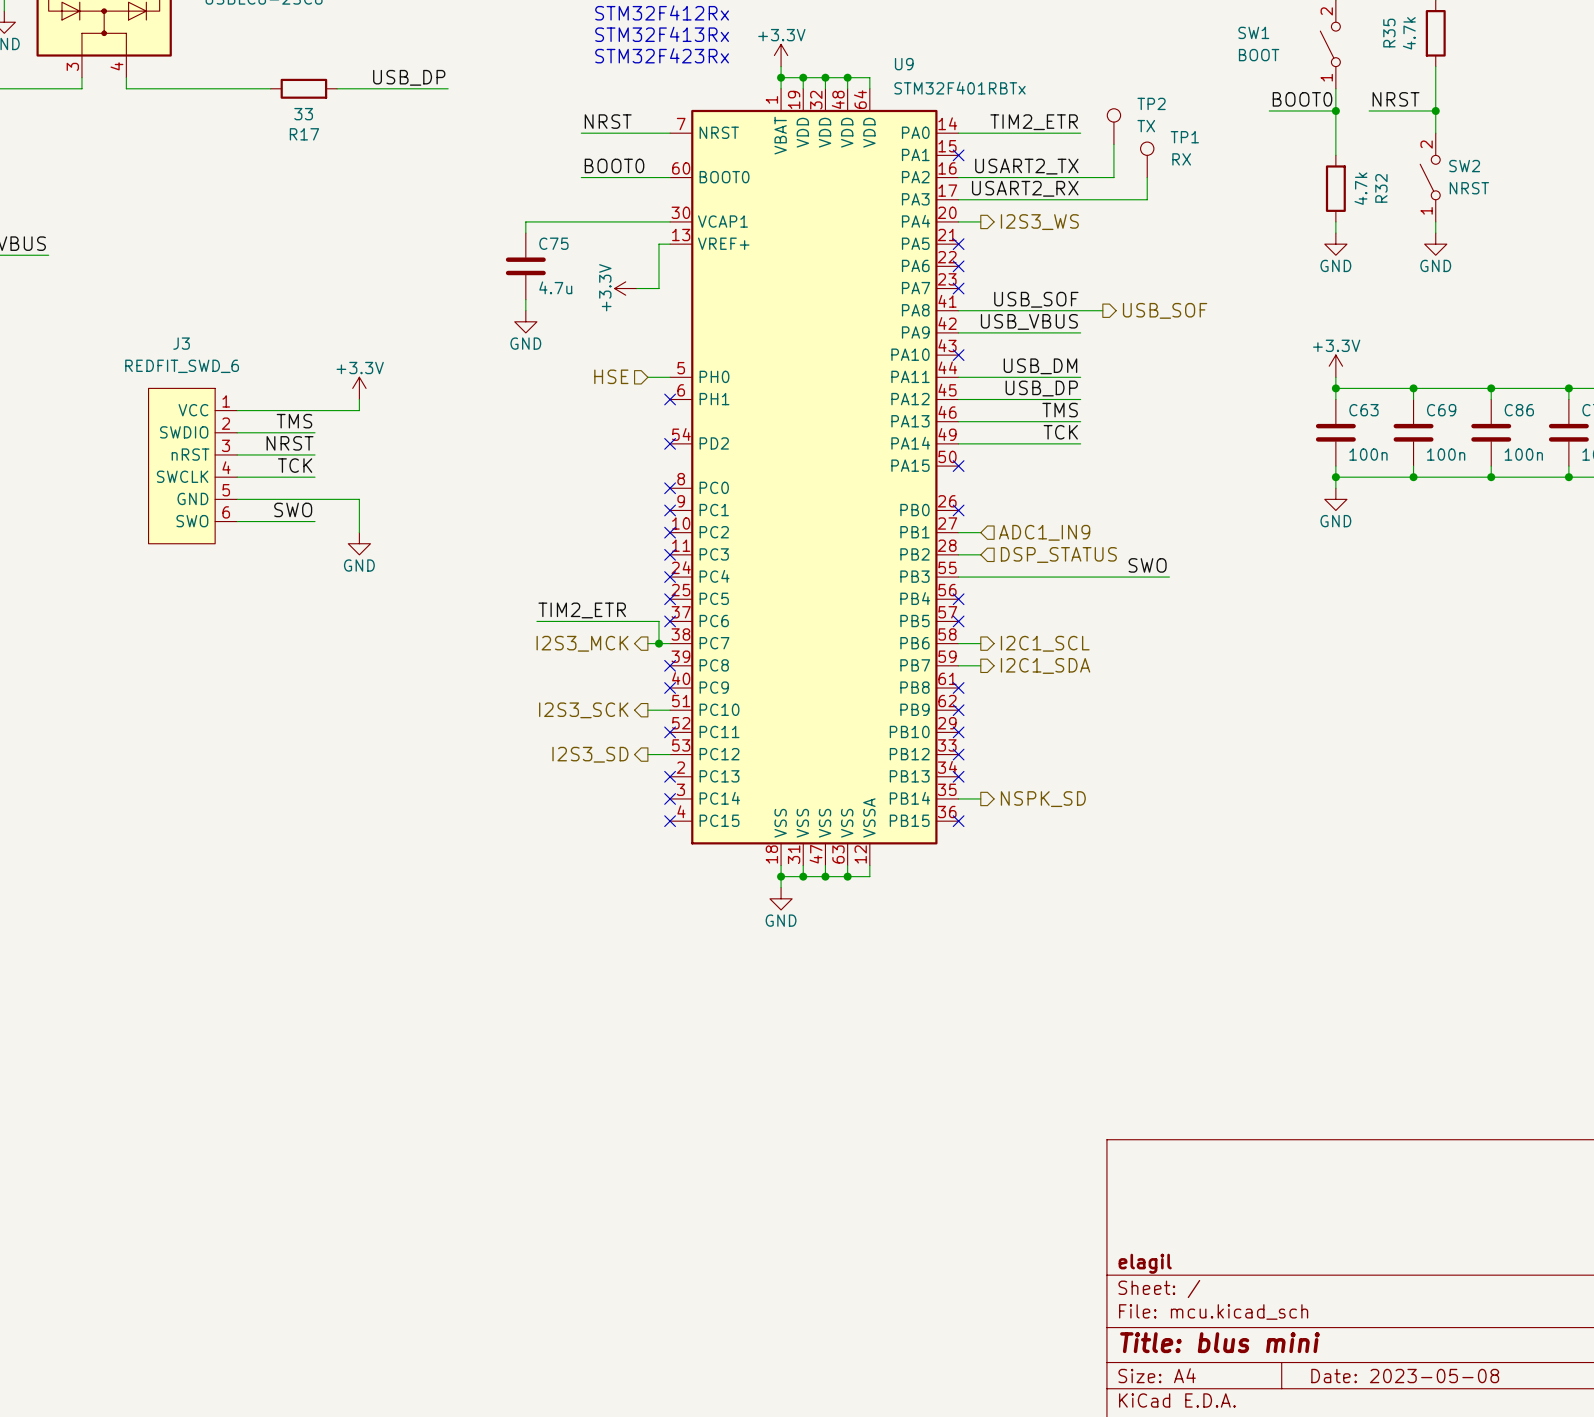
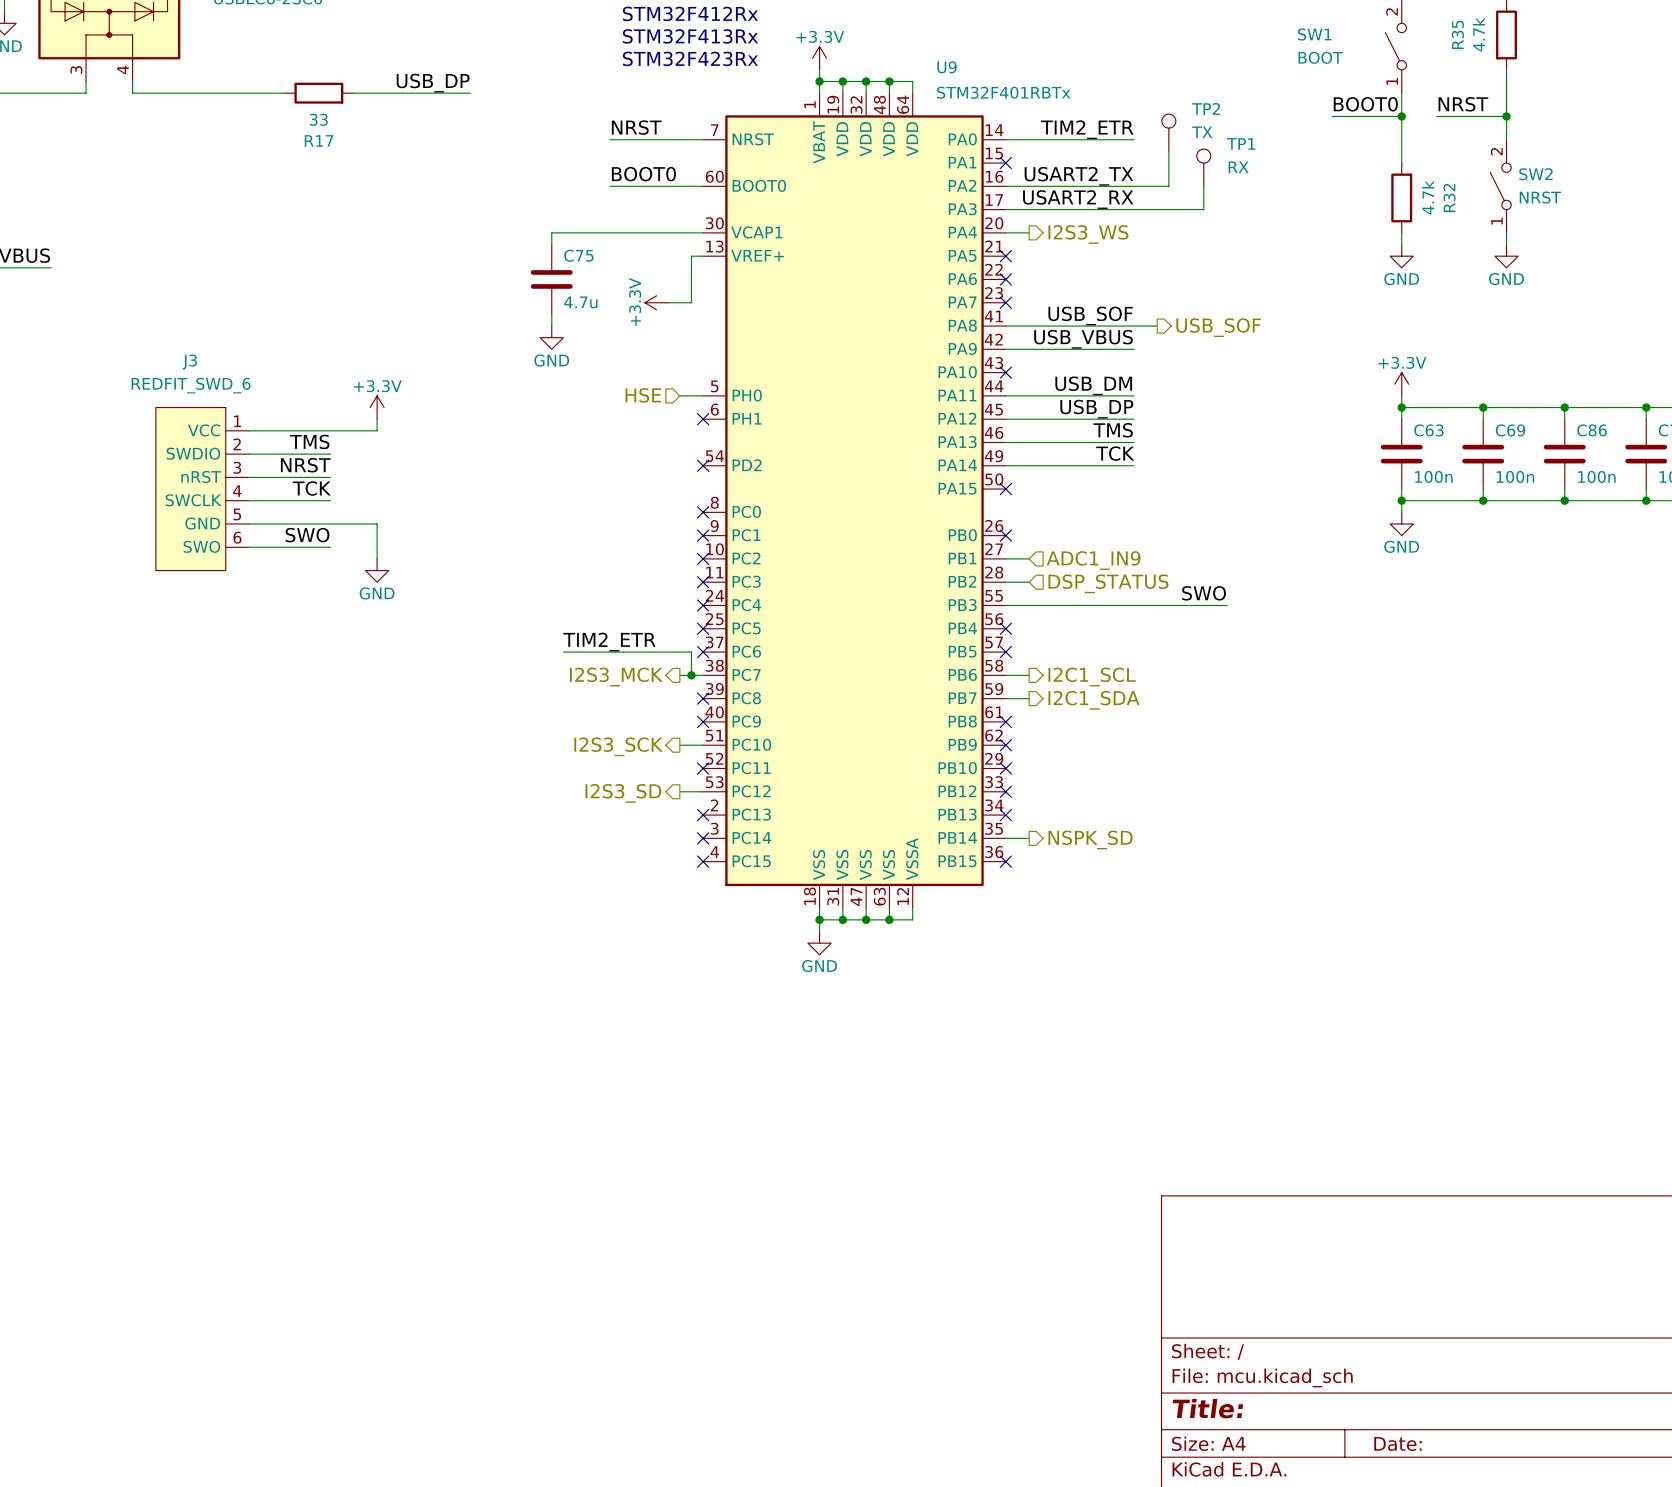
title block: elagil (1145, 1263) -> none
title block: Title: blus mini (1219, 1342) -> Title: (1207, 1408)
title block: Date: 2023-05-08 (1405, 1376) -> Date: (1397, 1443)

